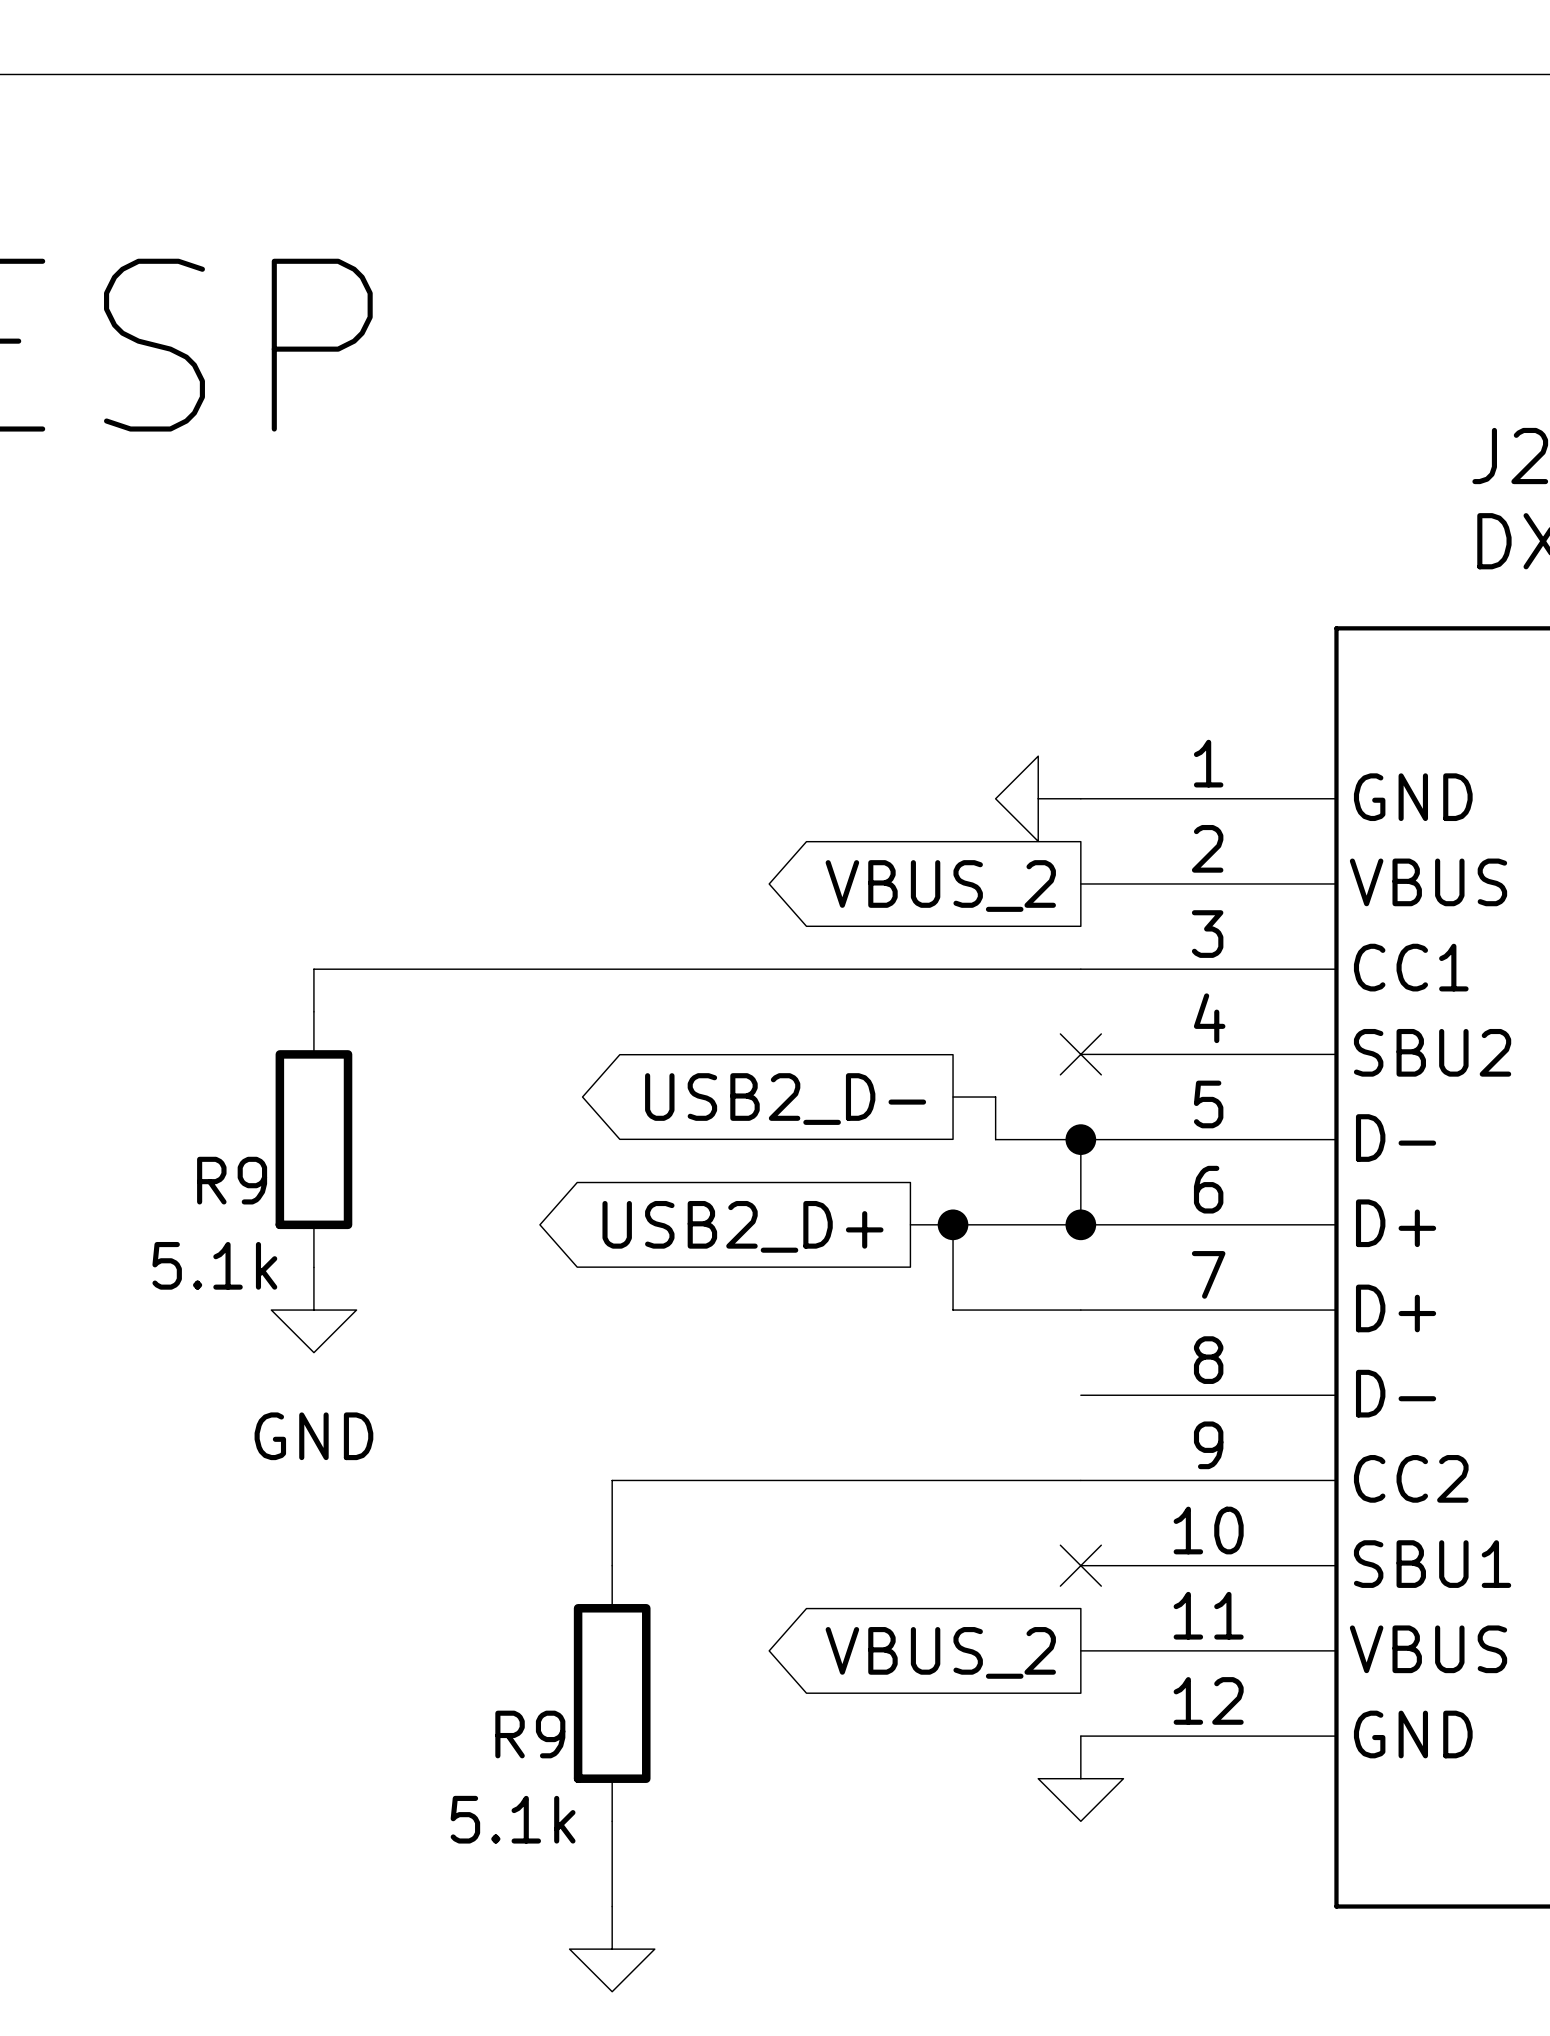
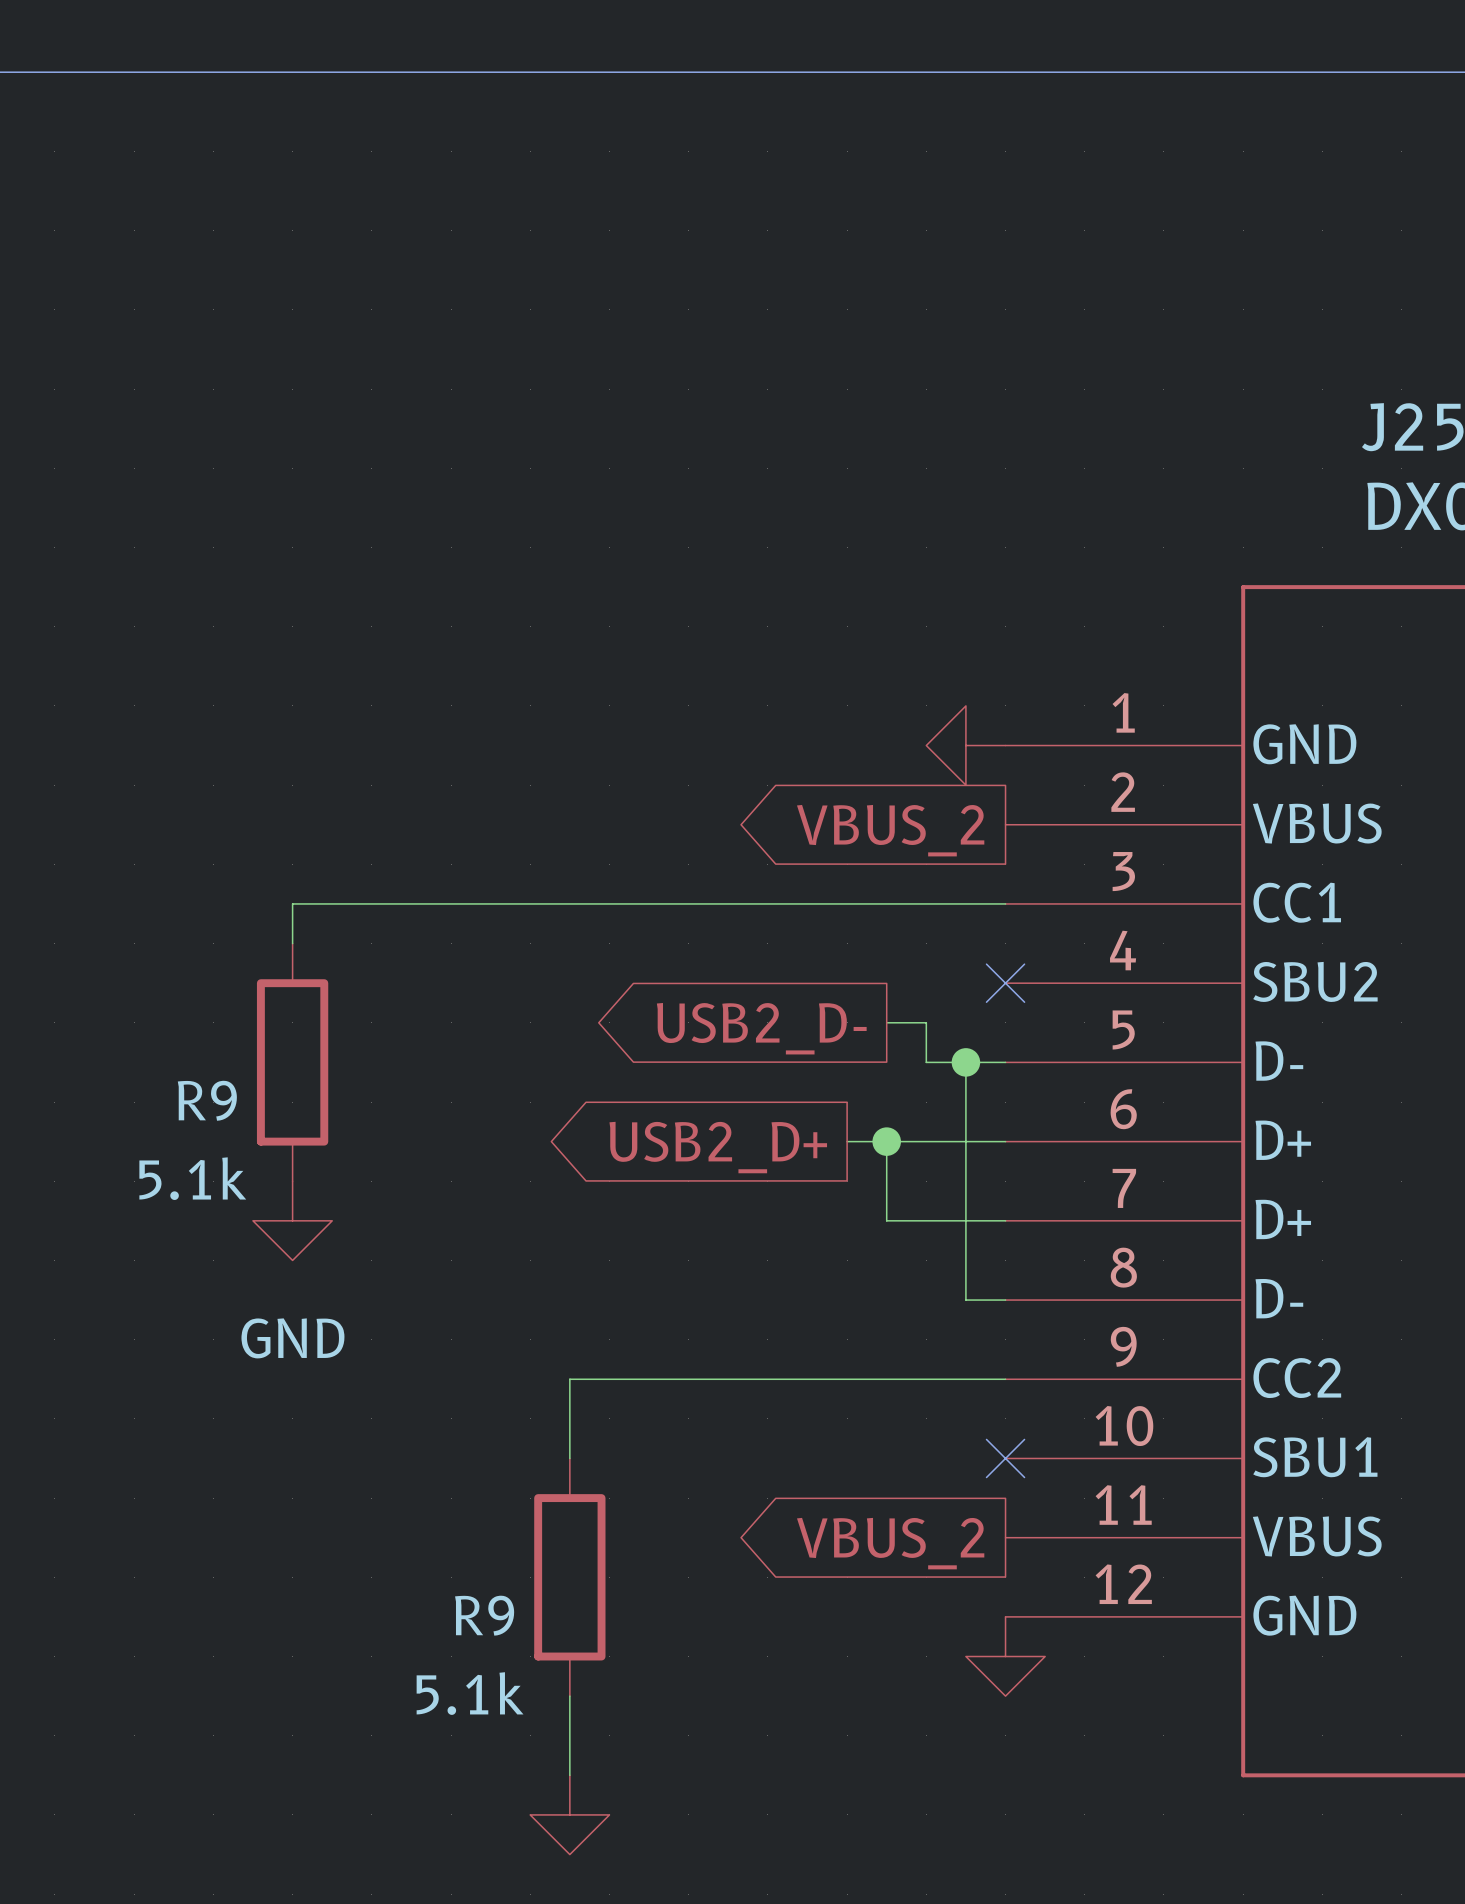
wire: none -> (965, 1062) (965, 1300) (1005, 1300)
wire: (1080, 1139) (1080, 1224) -> none
junction position: (1080, 1139) -> (965, 1062)
junction: (1080, 1224) -> none

